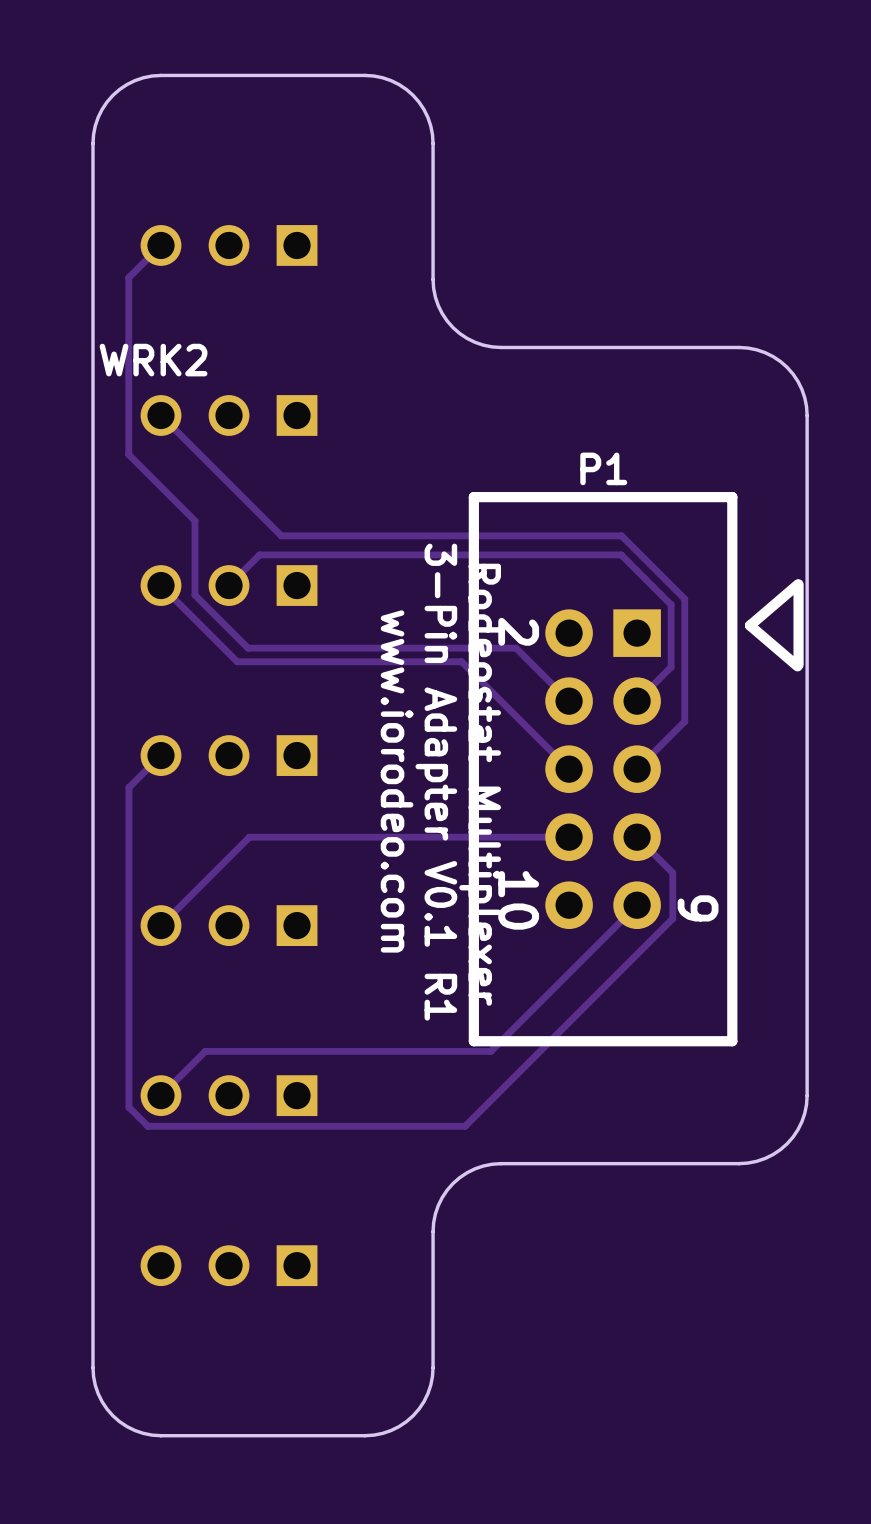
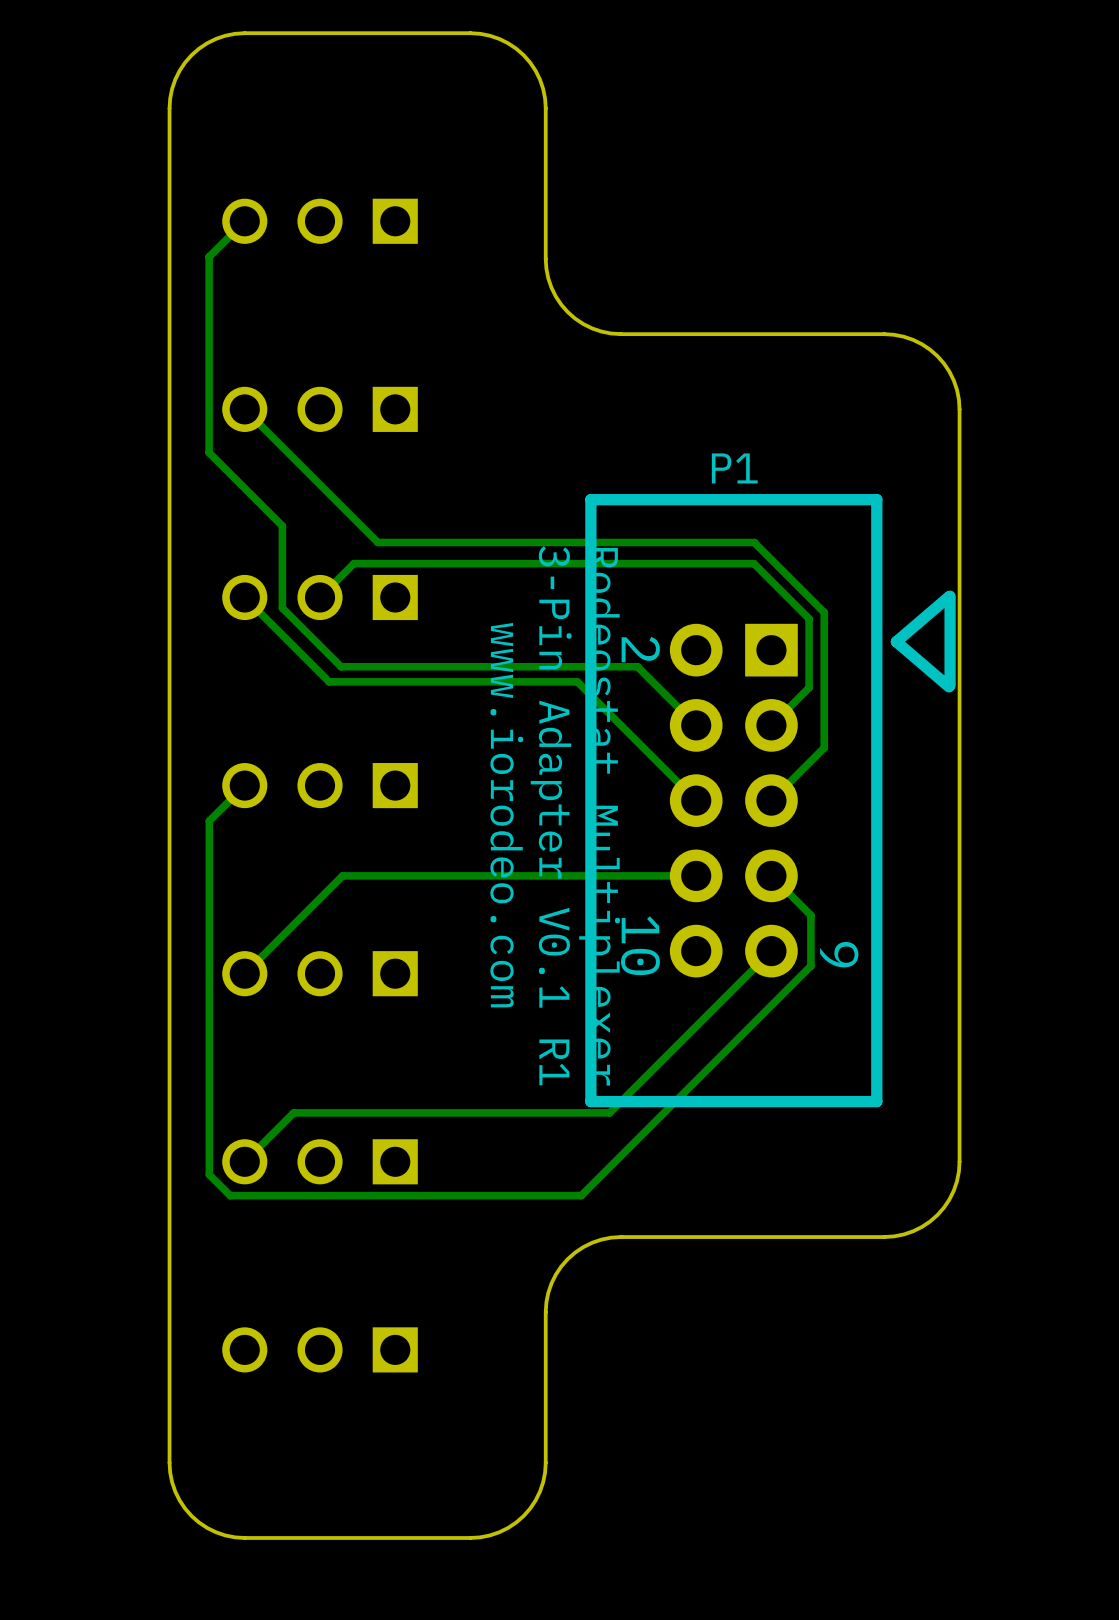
text: WRK2 (153, 360) -> none

